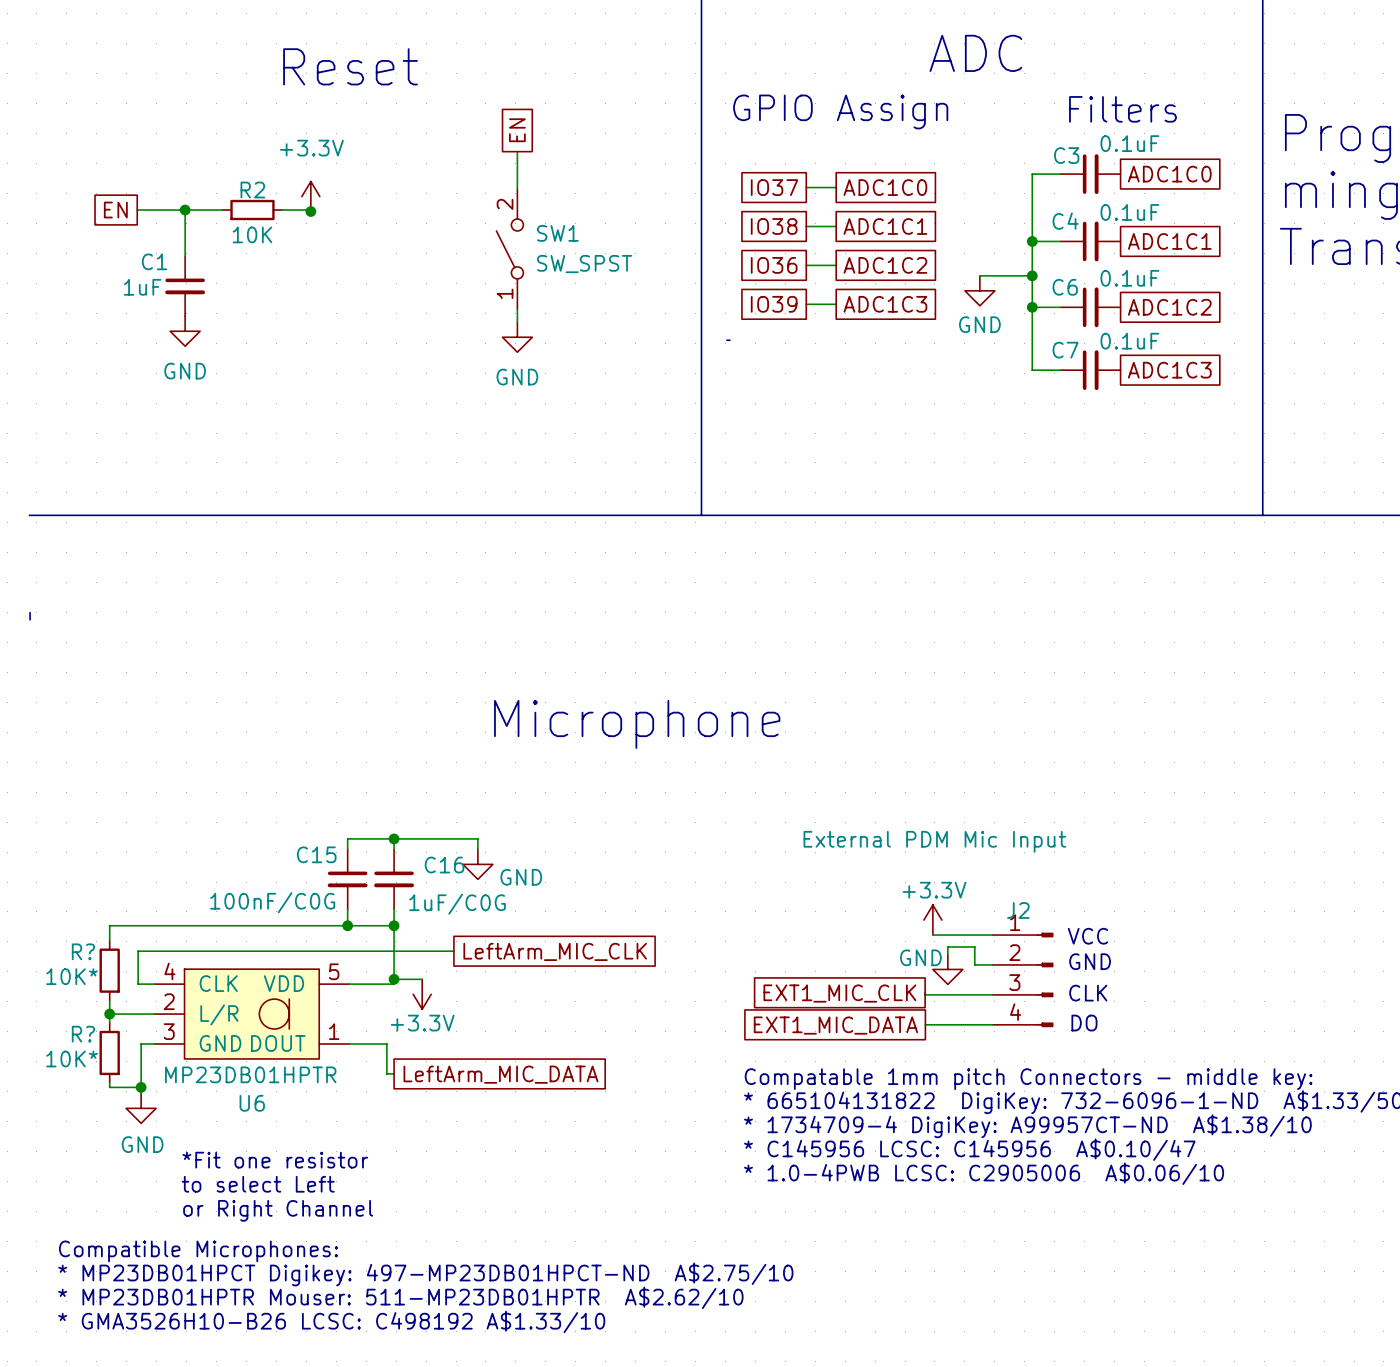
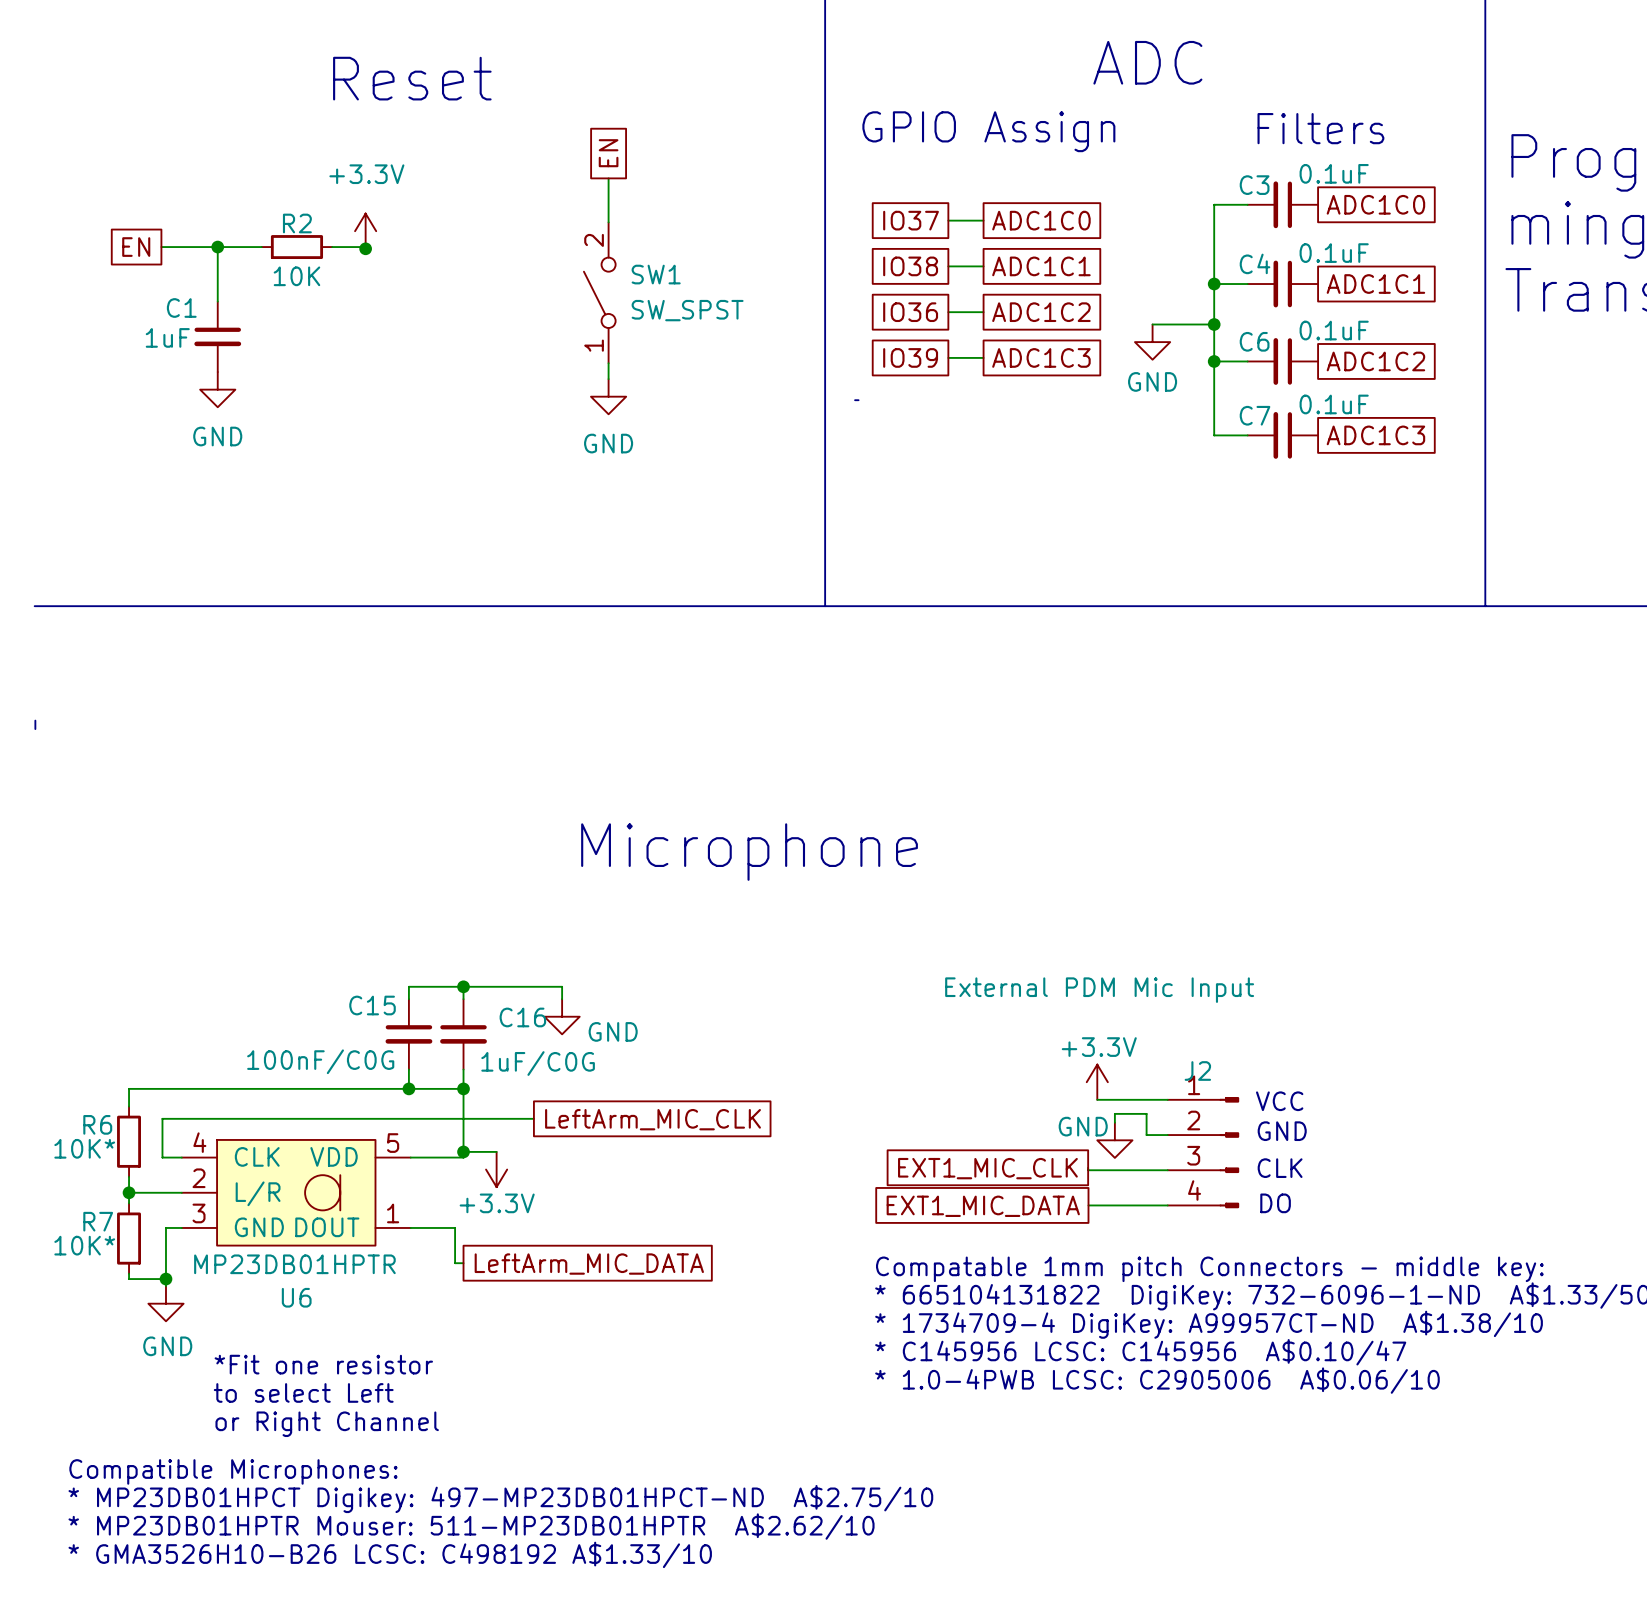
C3 rotation: 0° (1090, 174) -> 180° (1282, 204)
C4 rotation: 0° (1090, 241) -> 180° (1282, 284)
C6 rotation: 0° (1090, 307) -> 180° (1282, 361)
C7 rotation: 0° (1090, 370) -> 180° (1282, 435)
R? name: R? (83, 951) -> R6 (97, 1124)
R? name: R? (83, 1034) -> R7 (98, 1221)

